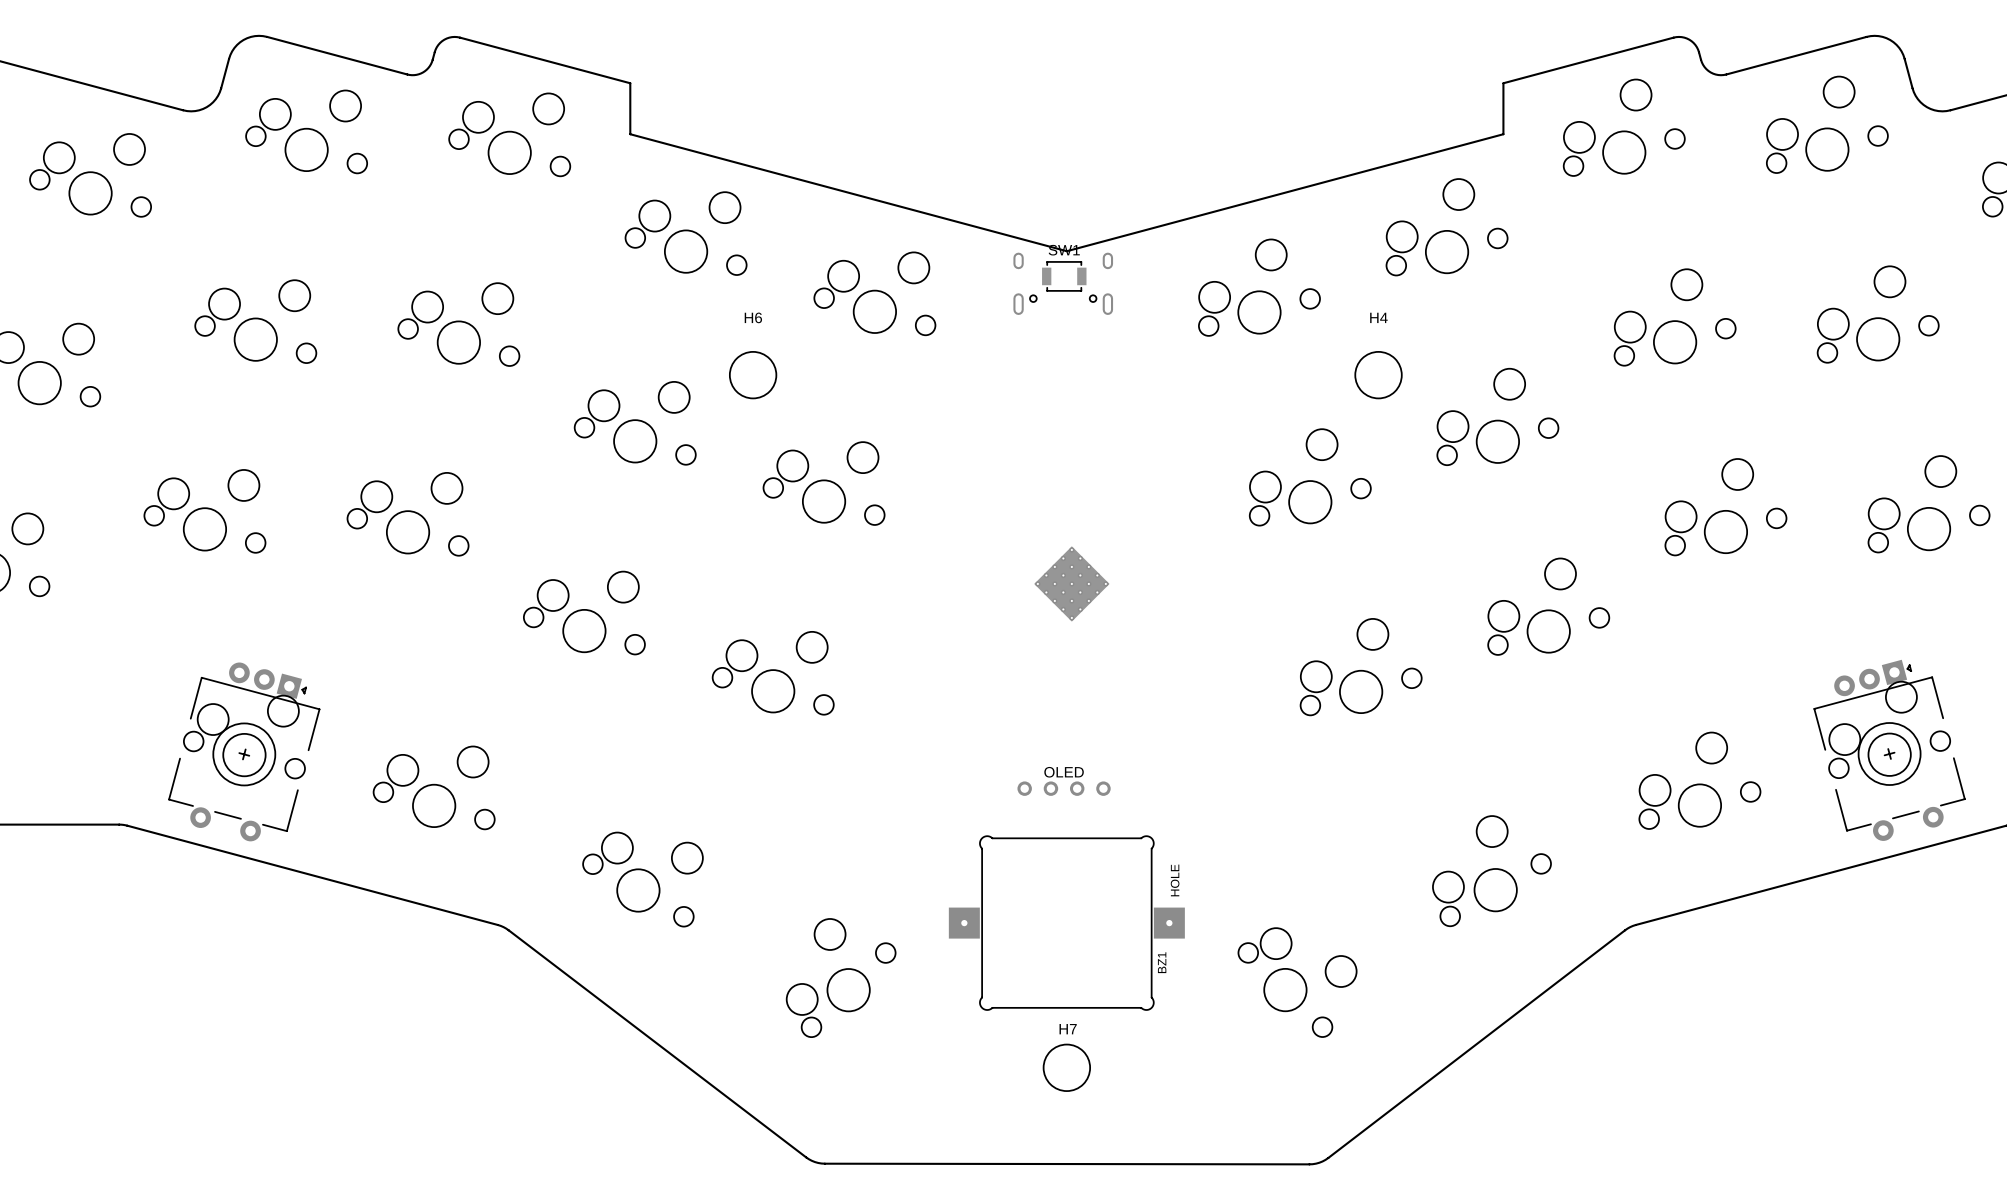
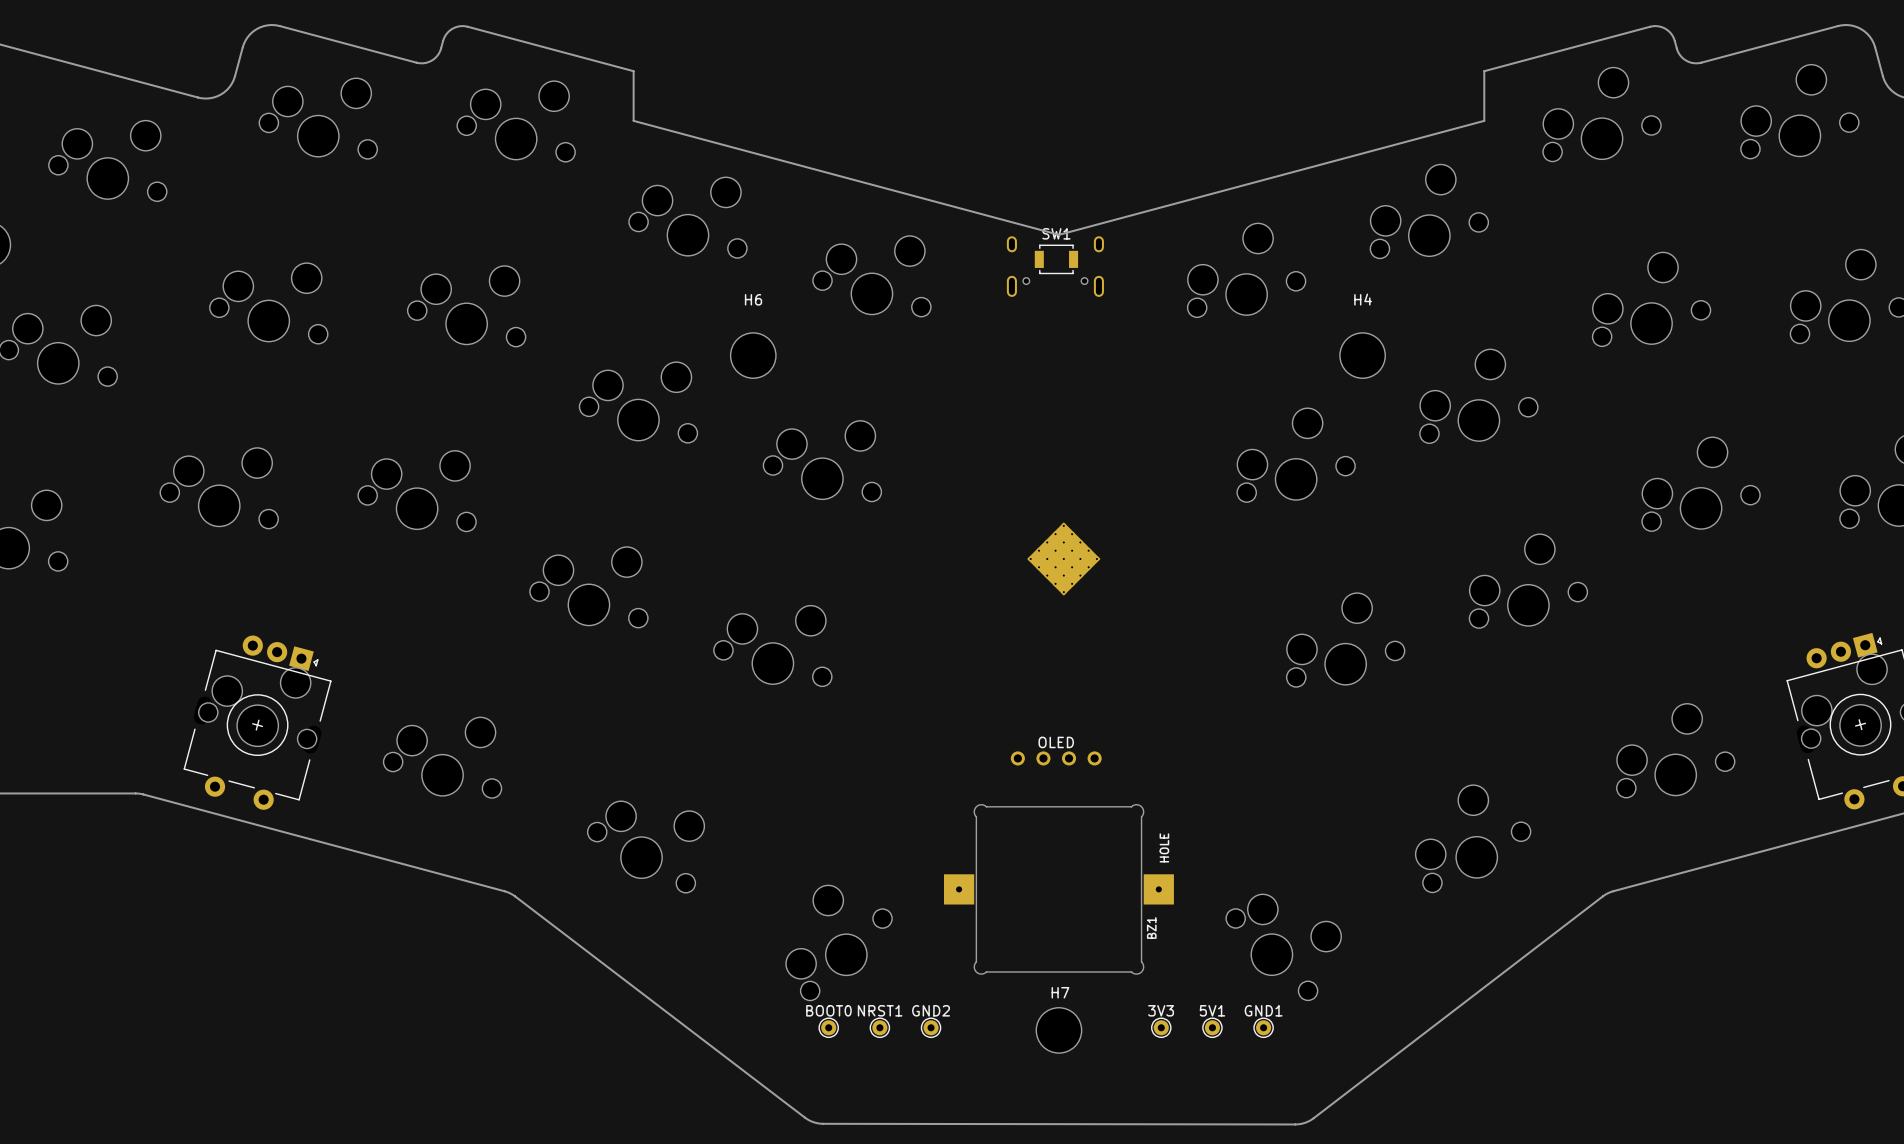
BOOT0: none -> (828, 1027)
NRST1: none -> (879, 1027)
GND2: none -> (931, 1027)
3V3: none -> (1161, 1027)
5V1: none -> (1212, 1027)
GND1: none -> (1263, 1027)

